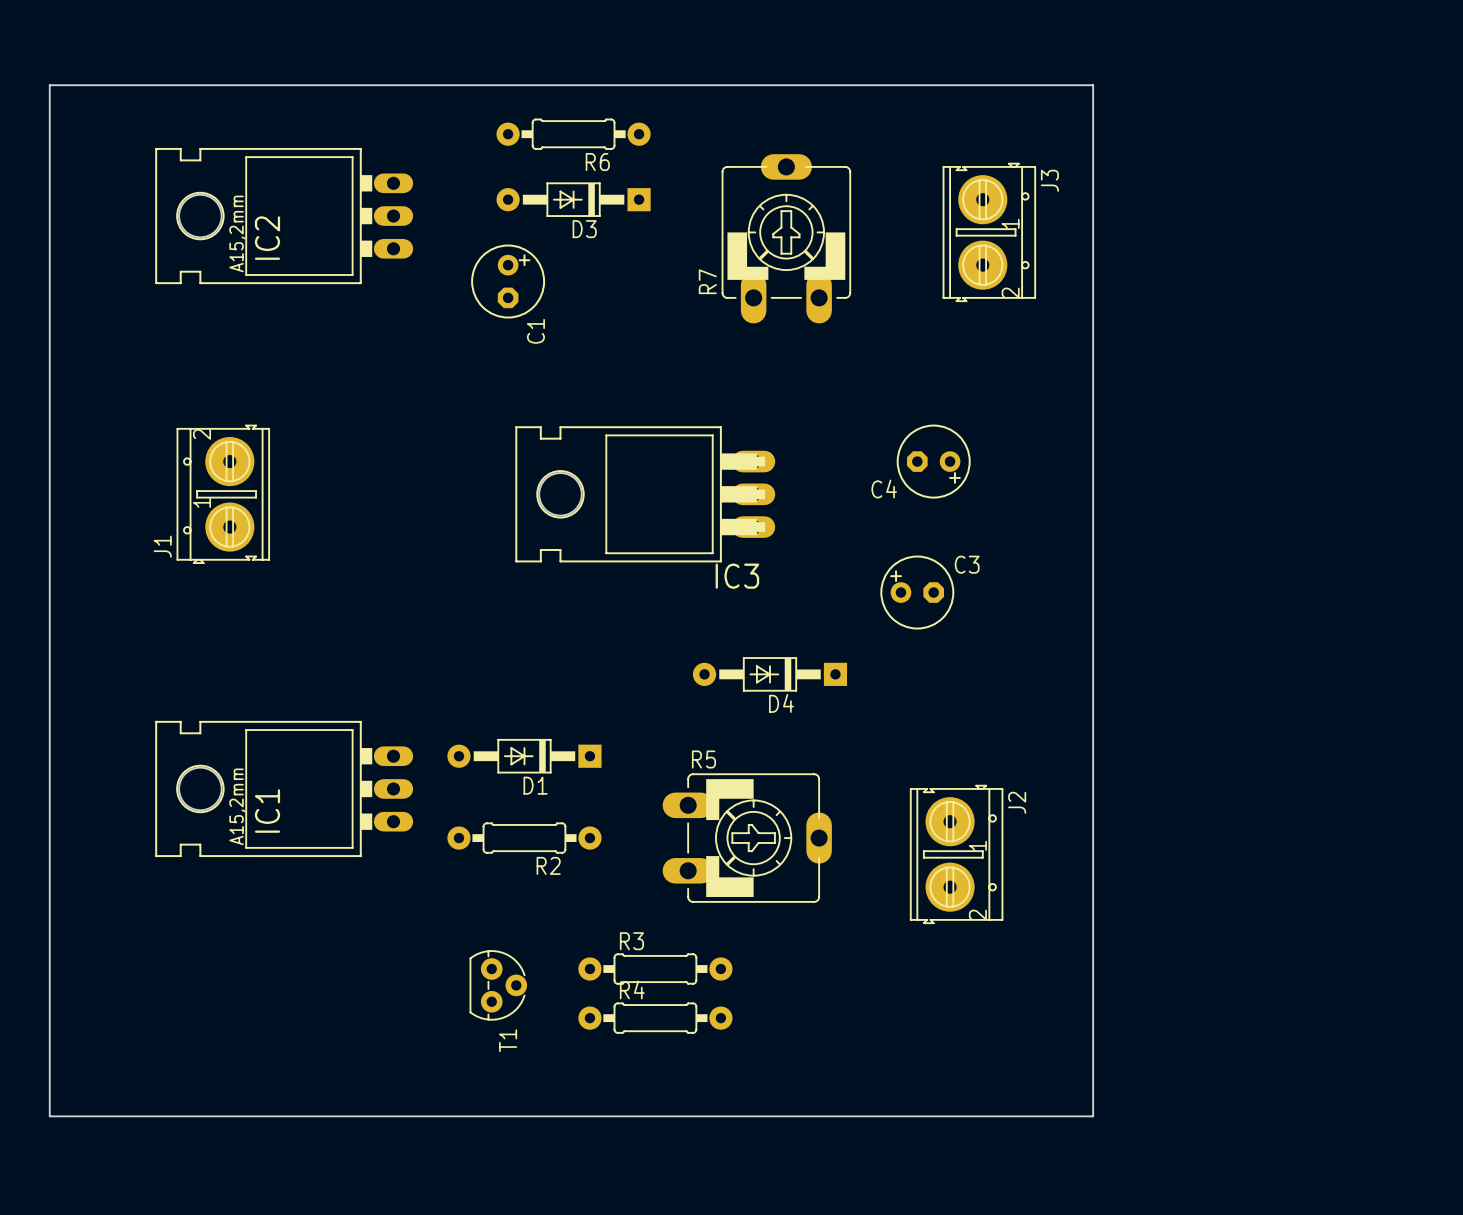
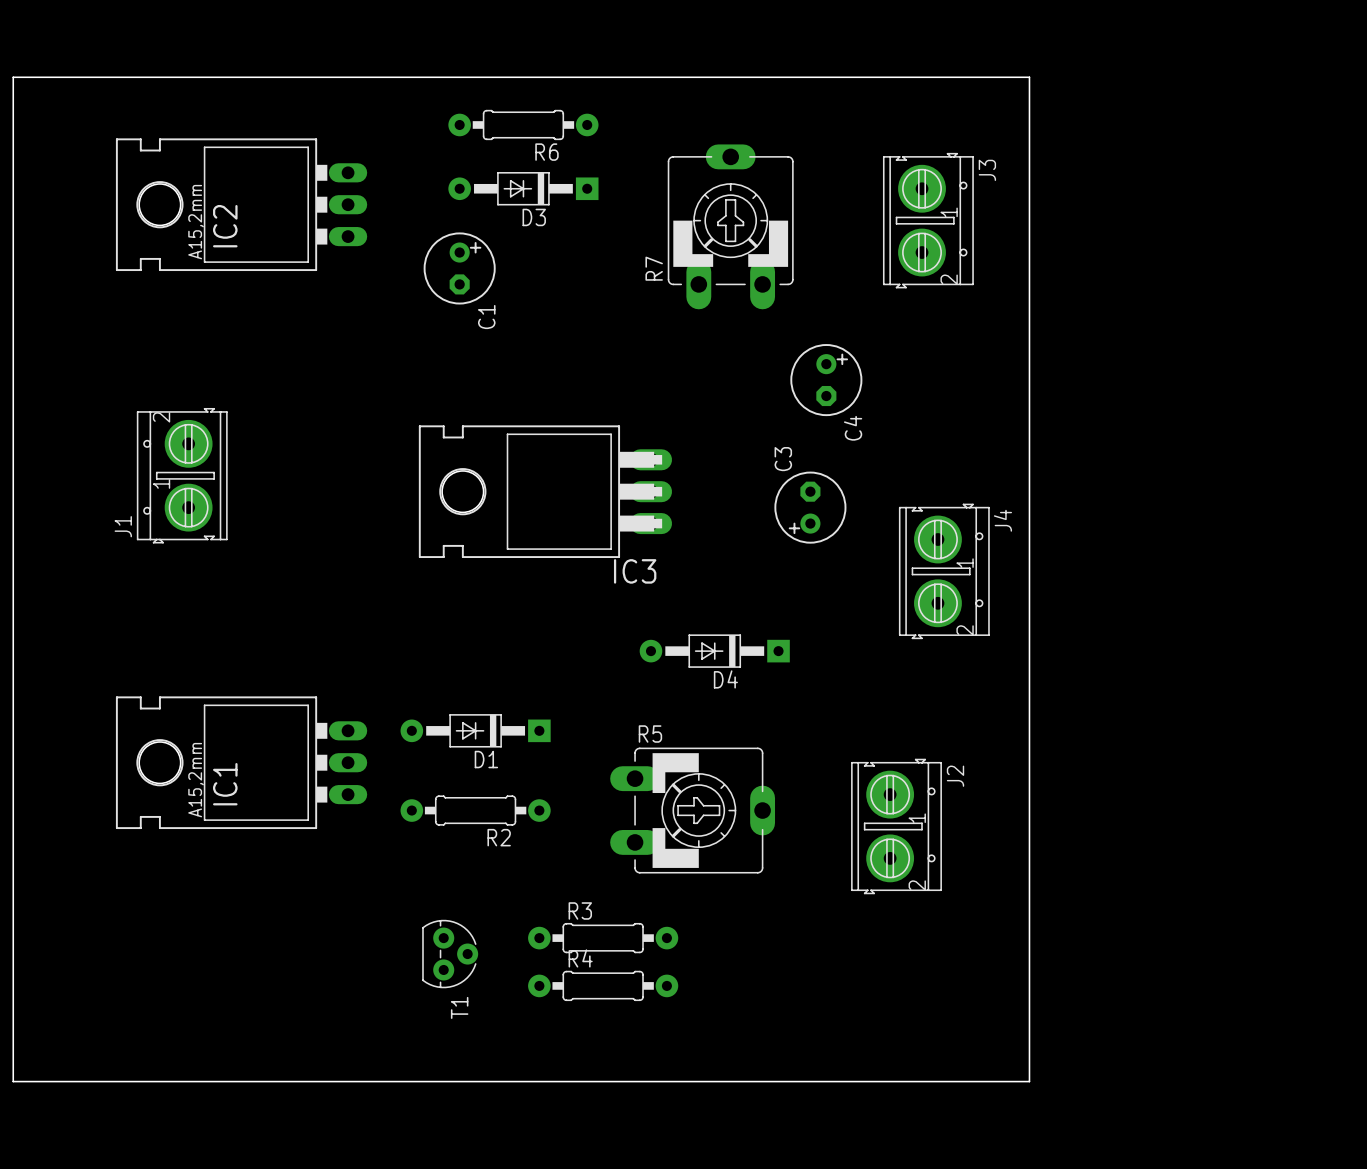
C4 rotation: 0° (933, 461) -> 90° counterclockwise (826, 380)
C4 position: (933, 461) -> (826, 380)
IC3 position: (645, 494) -> (545, 491)
C3 rotation: 0° (917, 592) -> 90° counterclockwise (810, 507)
C3 position: (917, 592) -> (810, 507)
J4: none -> (944, 571)

